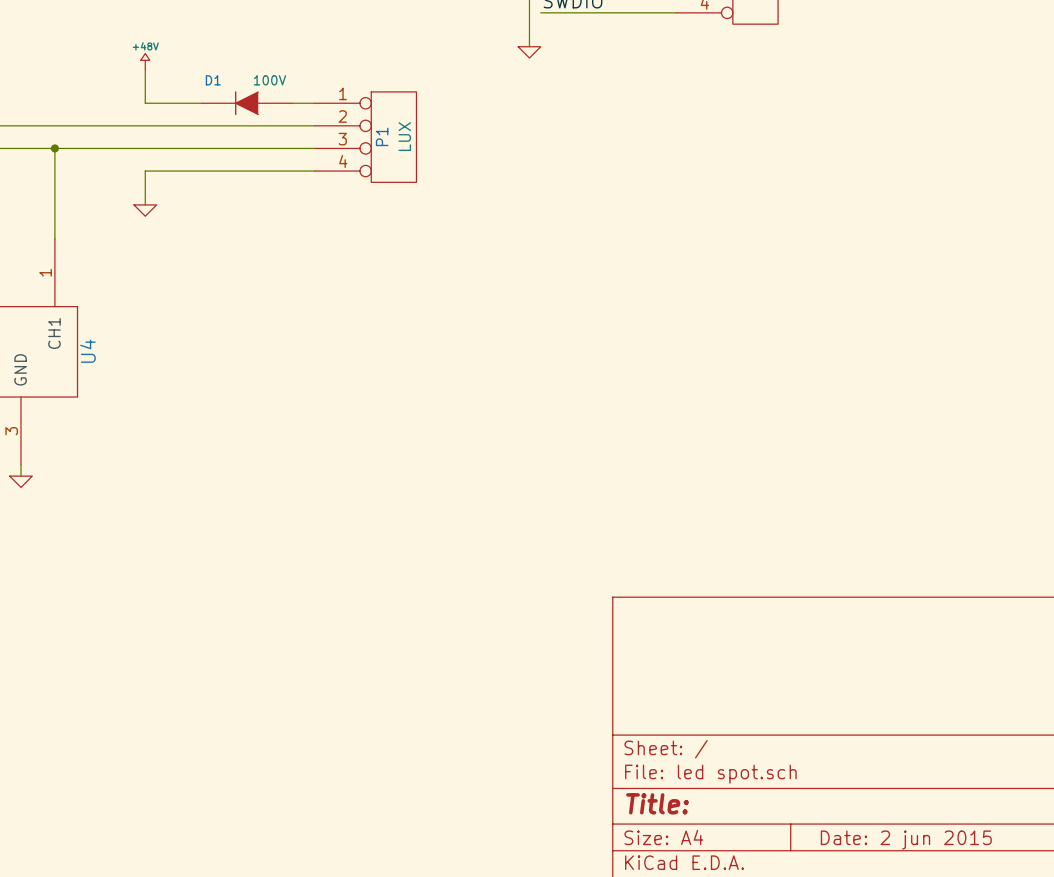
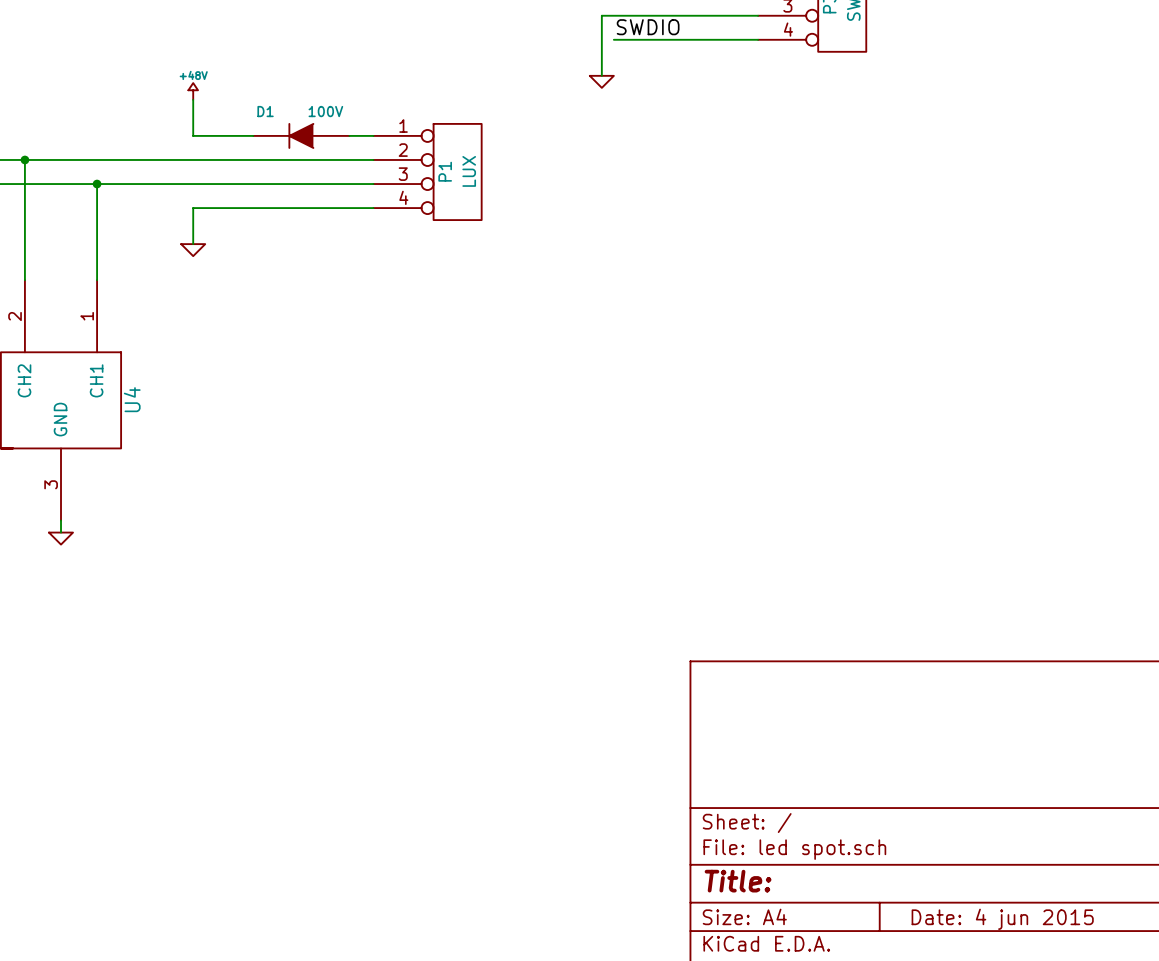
title block: Date: 2 jun 2015 (906, 840) -> Date: 4 jun 2015 (1002, 919)

